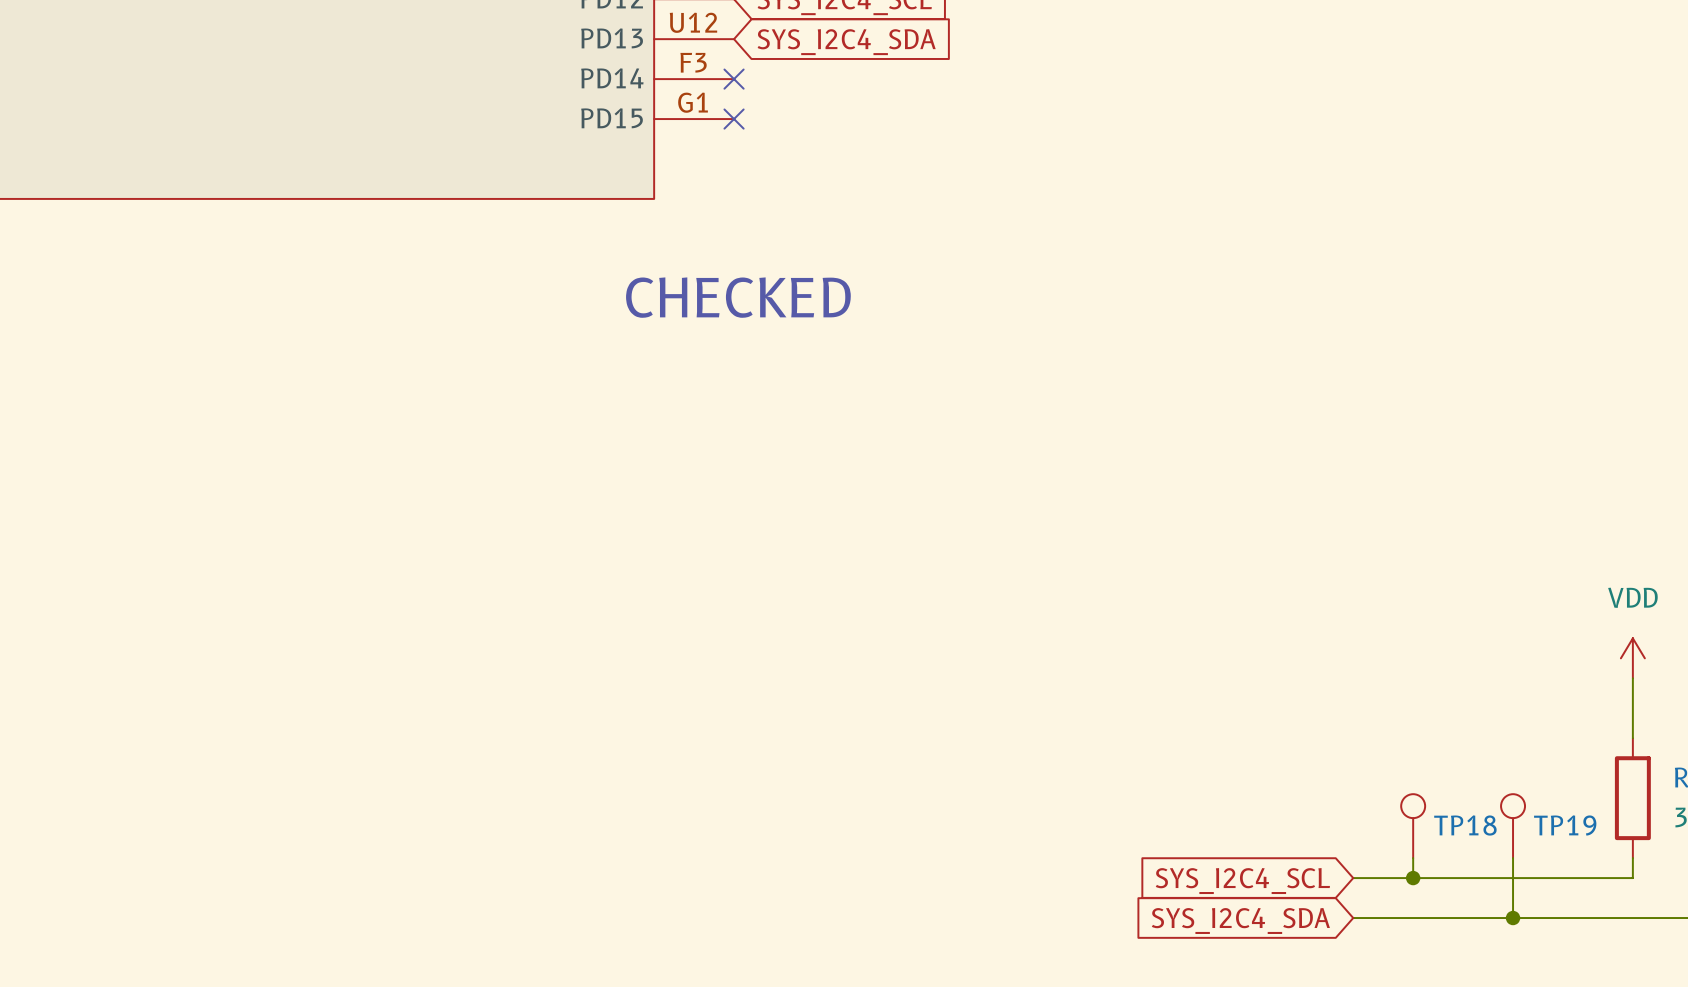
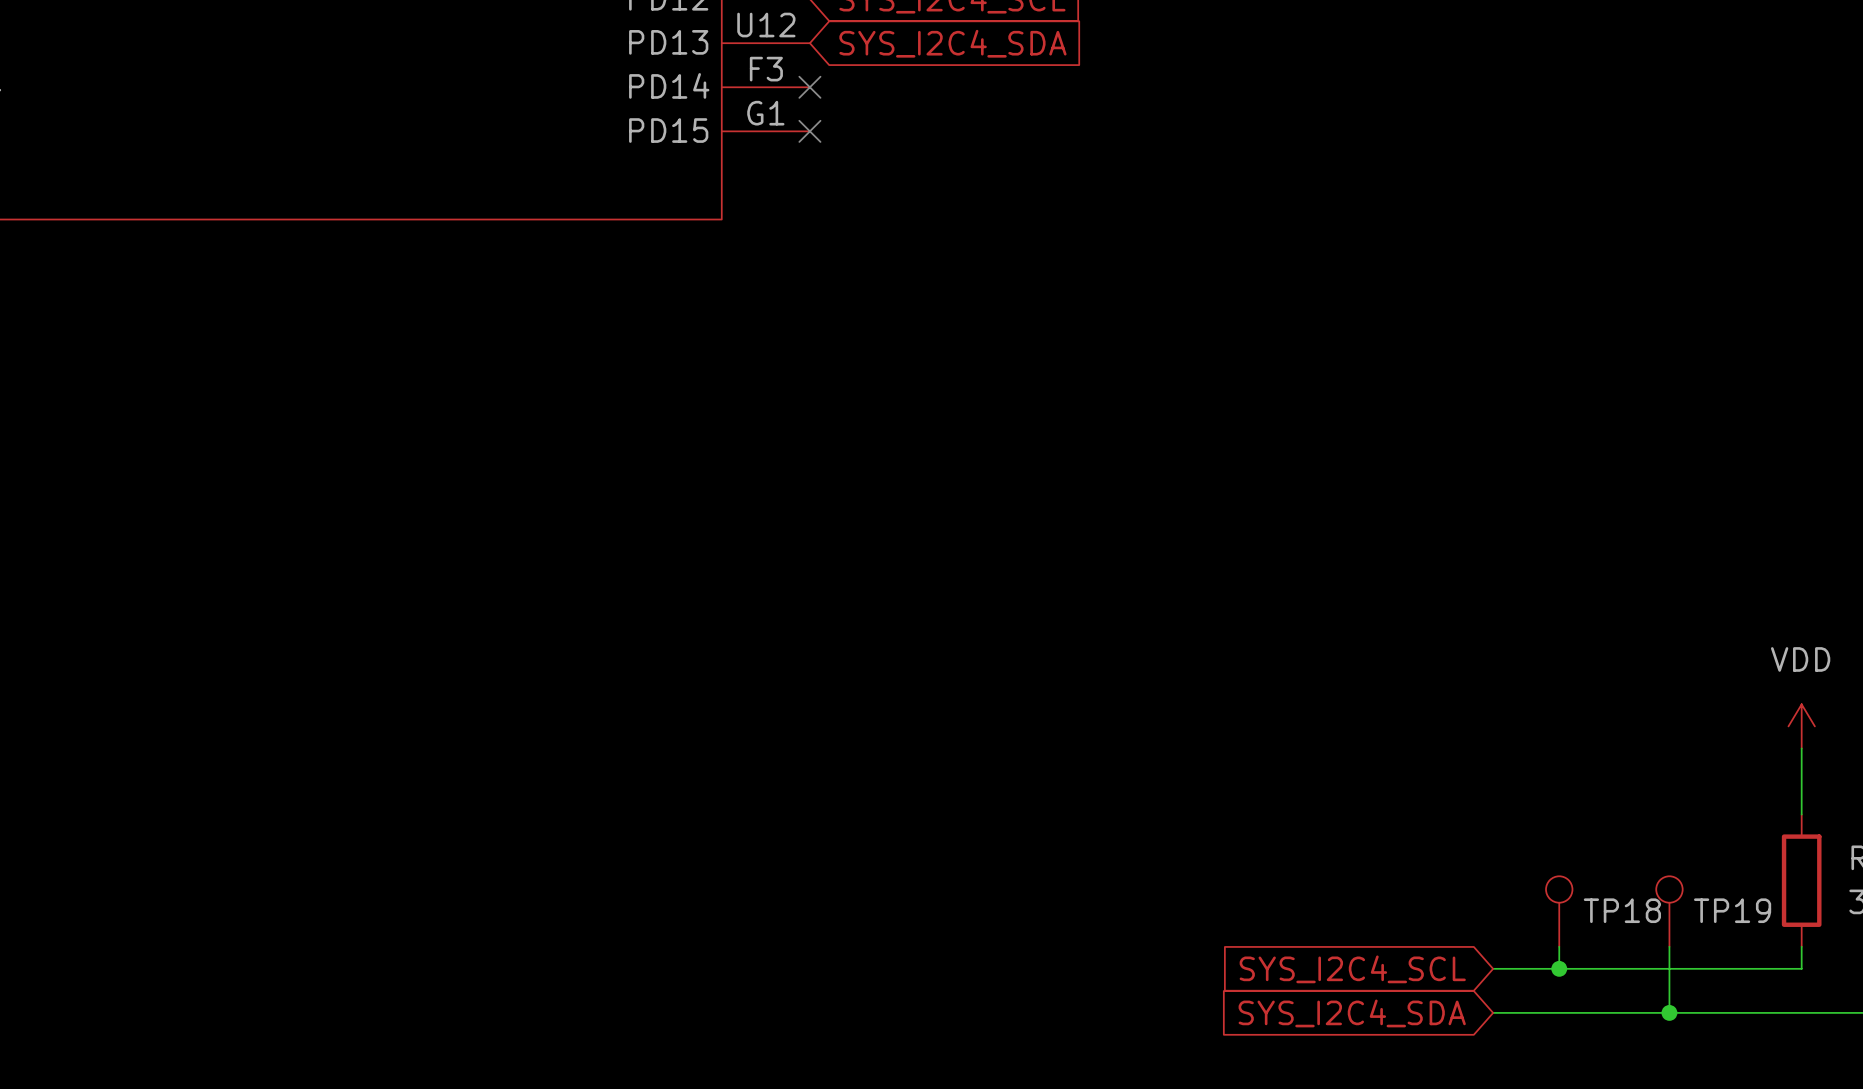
text: CHECKED (738, 297) -> none

